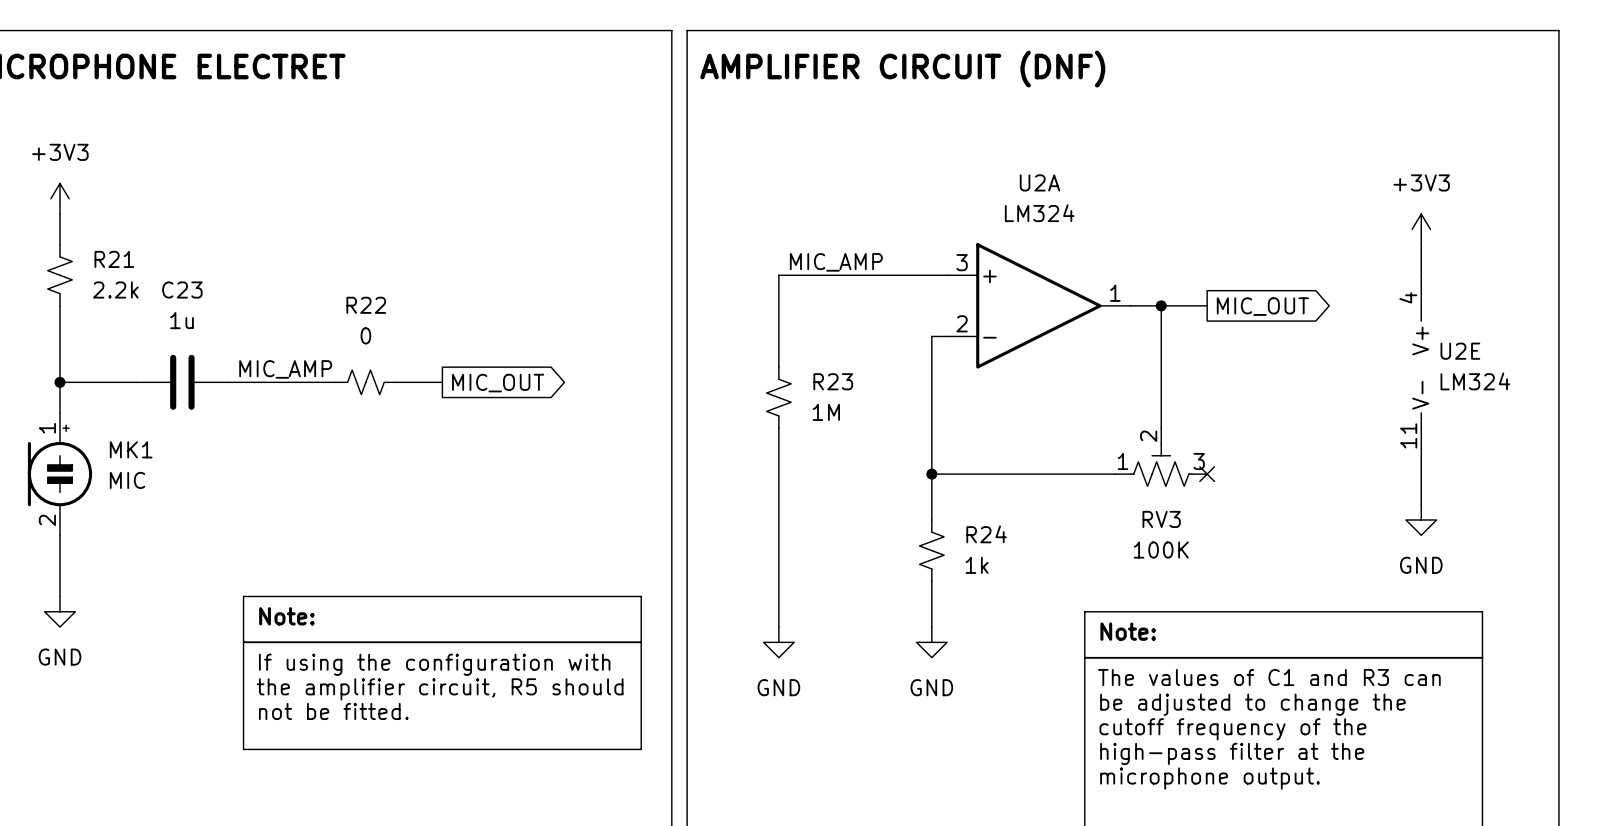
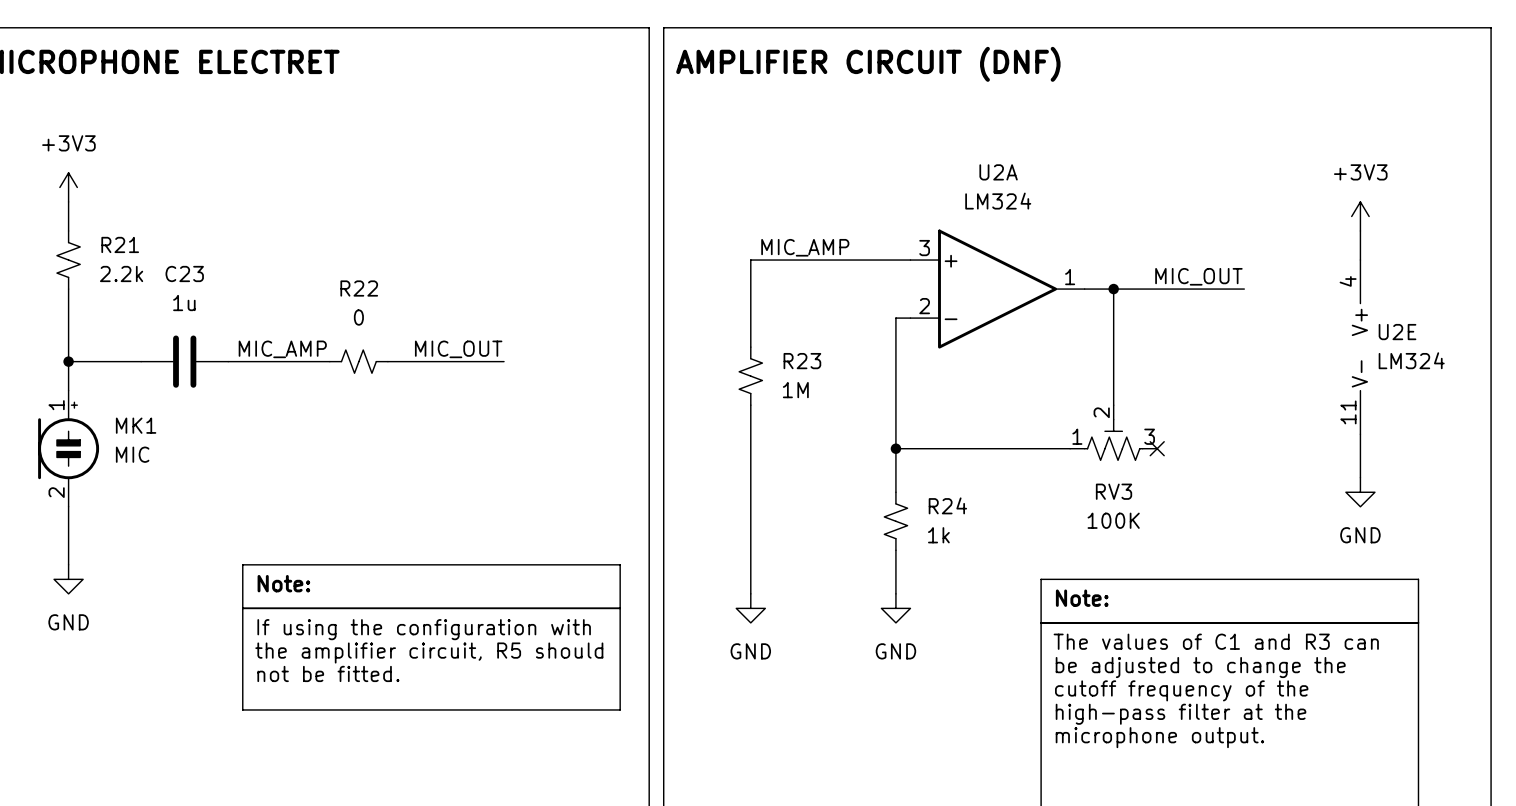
label: none -> MIC_OUT (1198, 276)
wire: none -> (1157, 289) (1244, 289)
global label: MIC_OUT (1262, 306) -> none
label: none -> MIC_OUT (458, 349)
wire: none -> (431, 361) (504, 361)
global label: MIC_OUT (498, 383) -> none

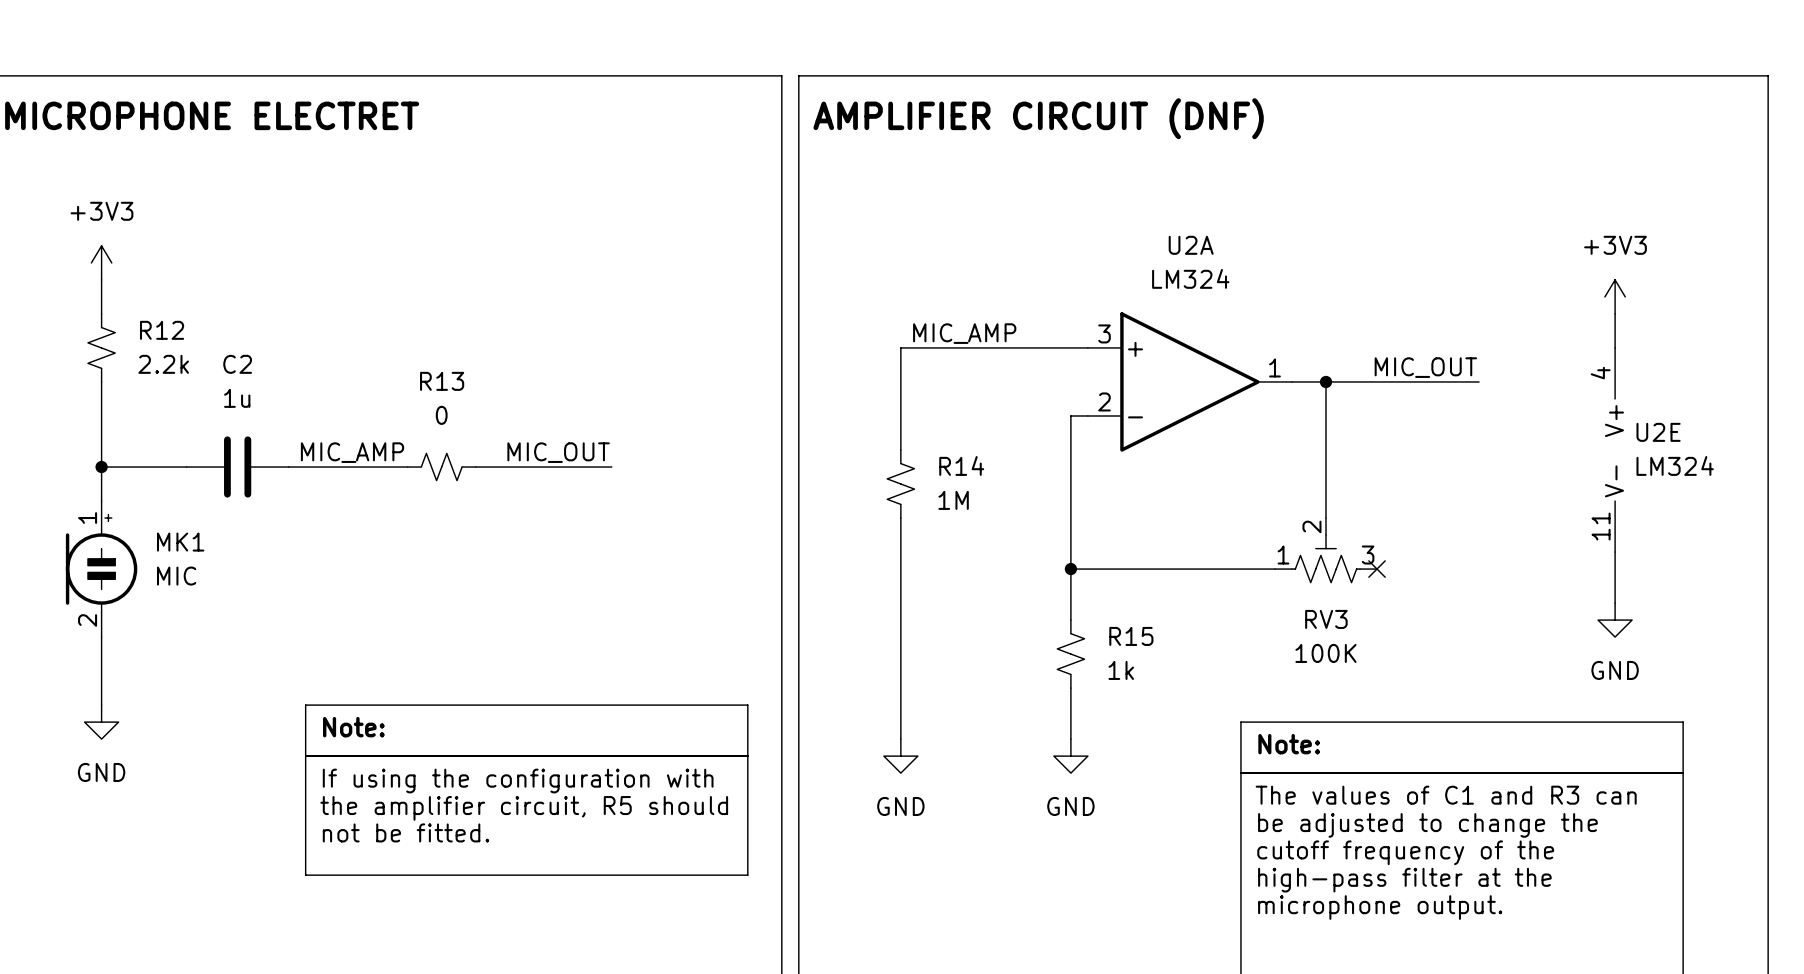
R21 name: R21 (120, 244) -> R12 (162, 330)
C23 name: C23 (184, 273) -> C2 (237, 364)
R22 name: R22 (359, 288) -> R13 (442, 381)
R23 name: R23 (802, 361) -> R14 (961, 465)
R24 name: R24 (947, 505) -> R15 (1131, 636)

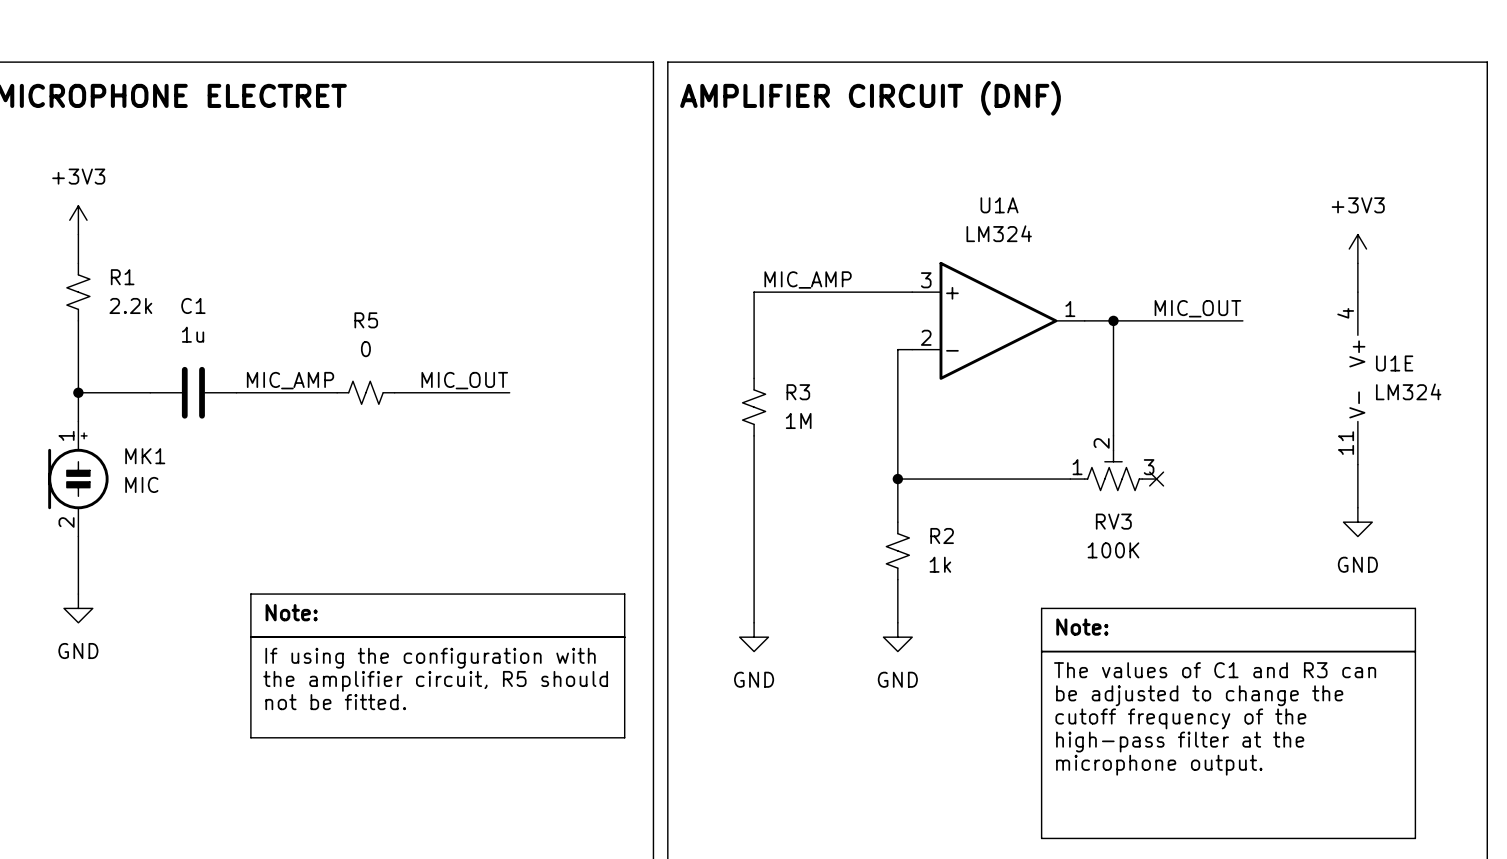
U2A name: U2A (1191, 245) -> U1A (999, 205)
R12 name: R12 (162, 330) -> R1 (122, 277)
C2 name: C2 (237, 364) -> C1 (193, 305)
R13 name: R13 (442, 381) -> R5 (366, 320)
U2E name: U2E (1658, 432) -> U1E (1394, 363)
R14 name: R14 (961, 465) -> R3 (798, 392)
R15 name: R15 (1131, 636) -> R2 (942, 535)

